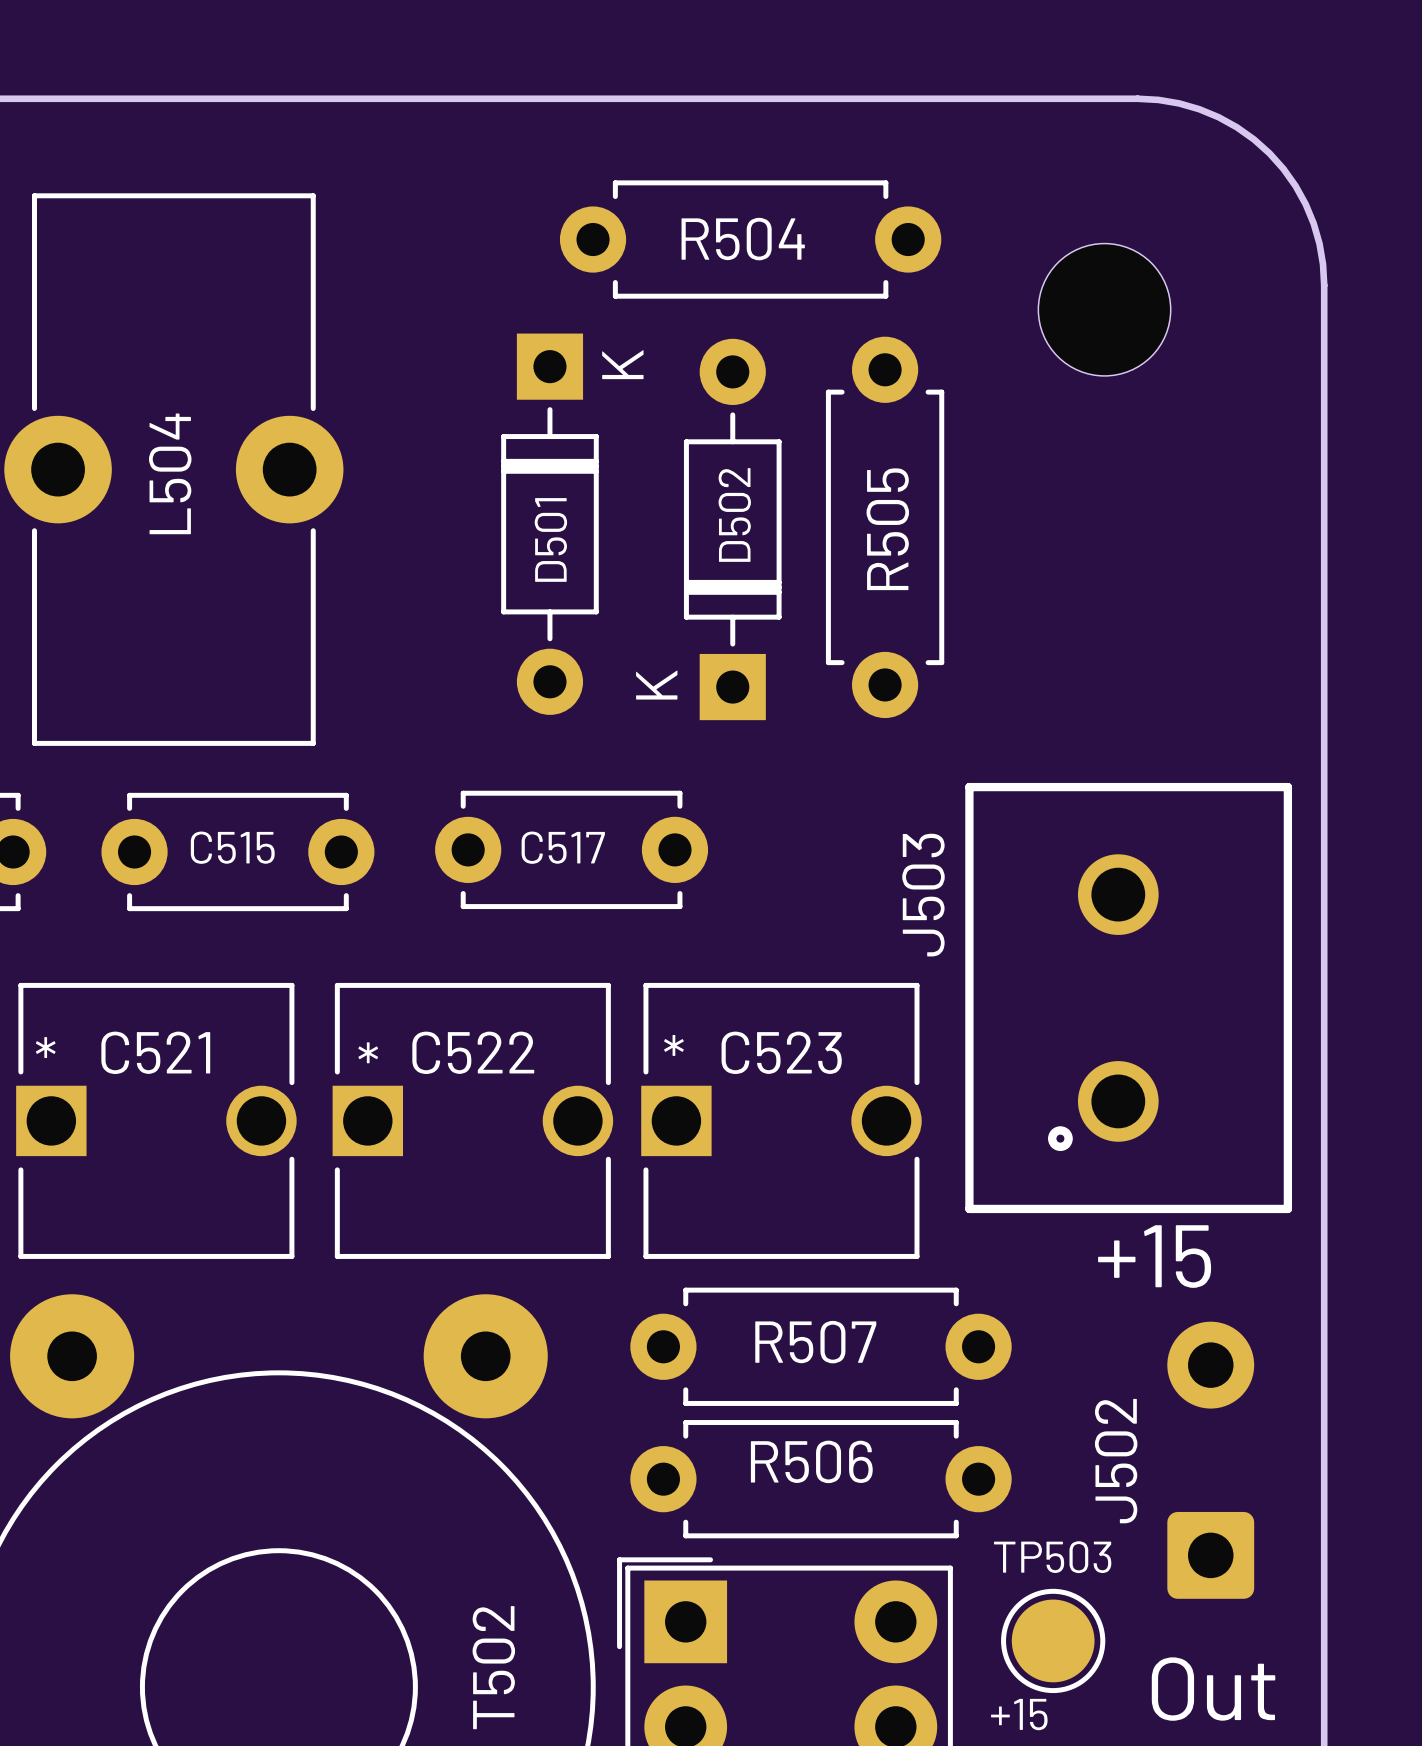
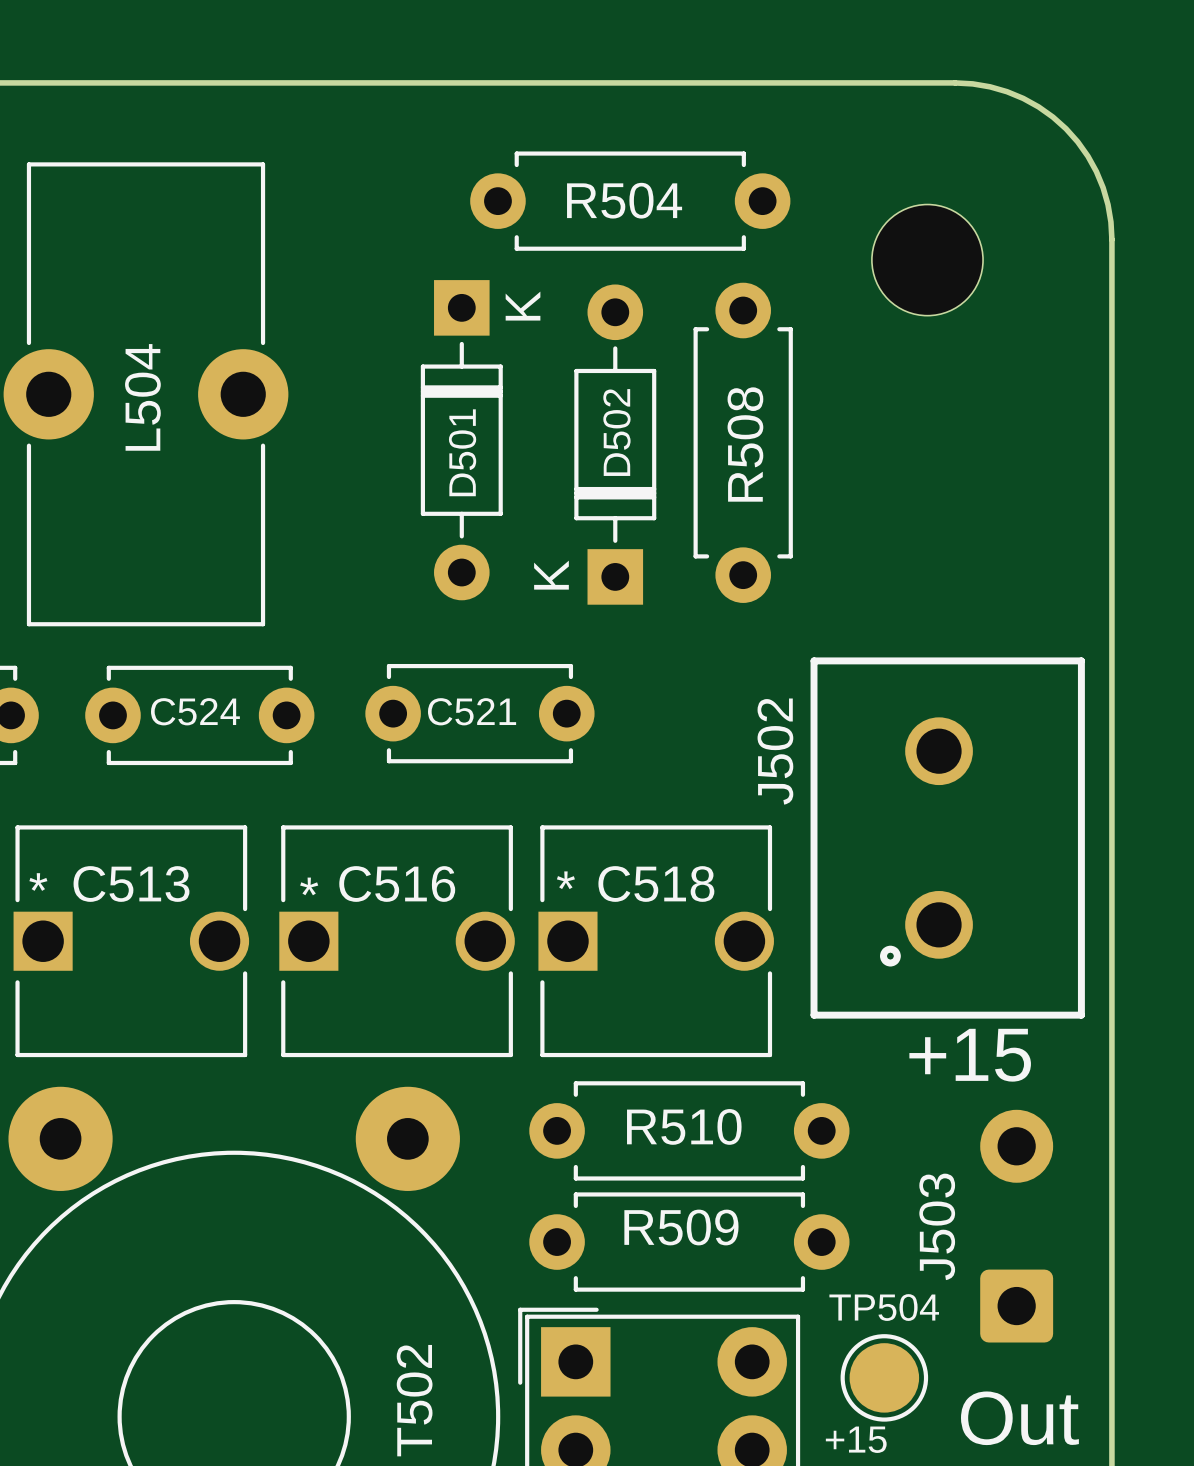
R505 name: R505 (887, 529) -> R508 (745, 444)
C515 name: C515 (232, 847) -> C524 (195, 711)
C517 name: C517 (563, 847) -> C521 (472, 711)
J503 name: J503 (923, 895) -> J502 (775, 751)
C521 name: C521 (155, 1052) -> C513 (131, 884)
C522 name: C522 (473, 1052) -> C516 (397, 884)
C523 name: C523 (781, 1052) -> C518 (656, 884)
R507 name: R507 (815, 1342) -> R510 (684, 1126)
R506 name: R506 (811, 1461) -> R509 (681, 1227)
J502 name: J502 (1116, 1461) -> J503 (937, 1226)
TP503 name: TP503 (1052, 1557) -> TP504 (884, 1307)

